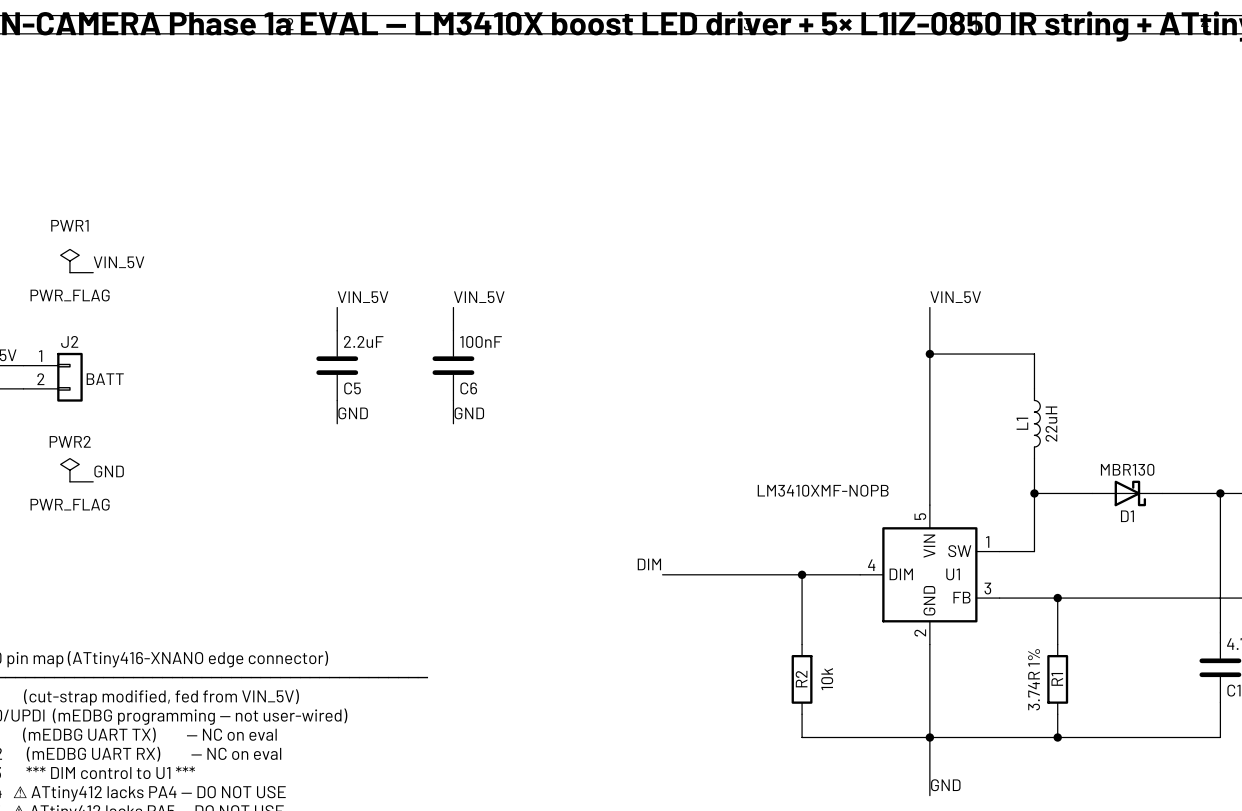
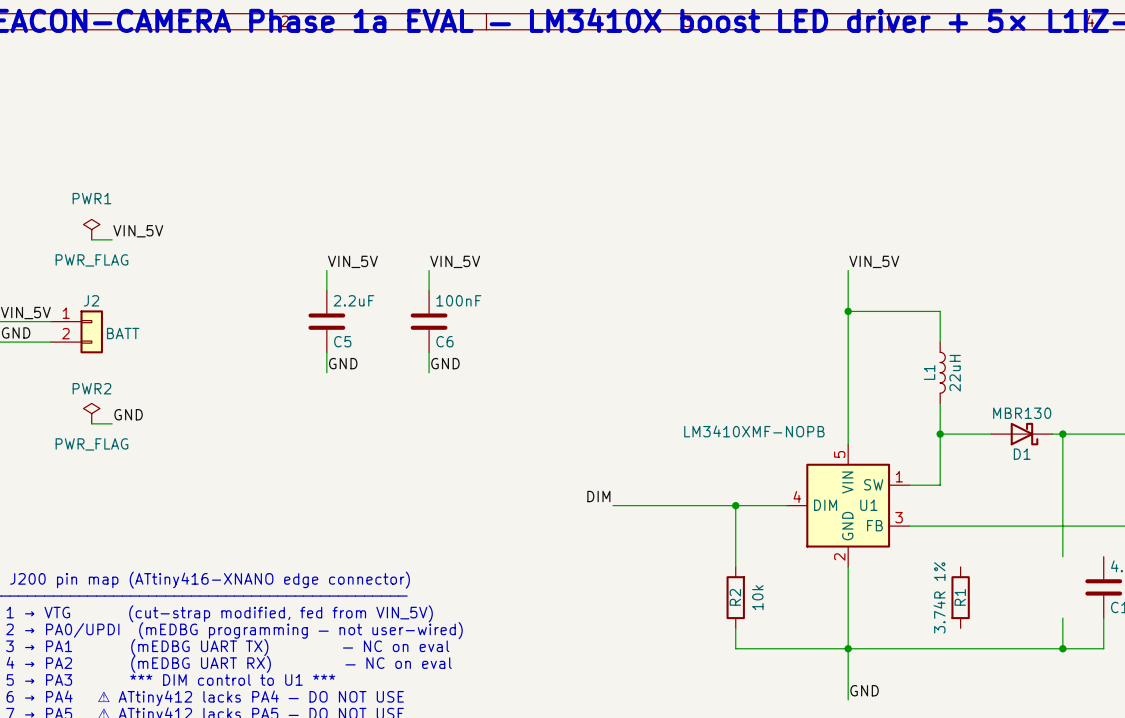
wire: (1220, 493) (1220, 632) -> (1062, 434) (1062, 556)
junction position: (1220, 493) -> (1062, 434)
wire: (1057, 598) (1057, 644) -> none
junction: (1057, 598) -> none
wire: none -> (1062, 618) (1062, 648)
wire: (1057, 714) (1057, 737) -> none
junction: (1057, 737) -> none
junction: none -> (1062, 648)

